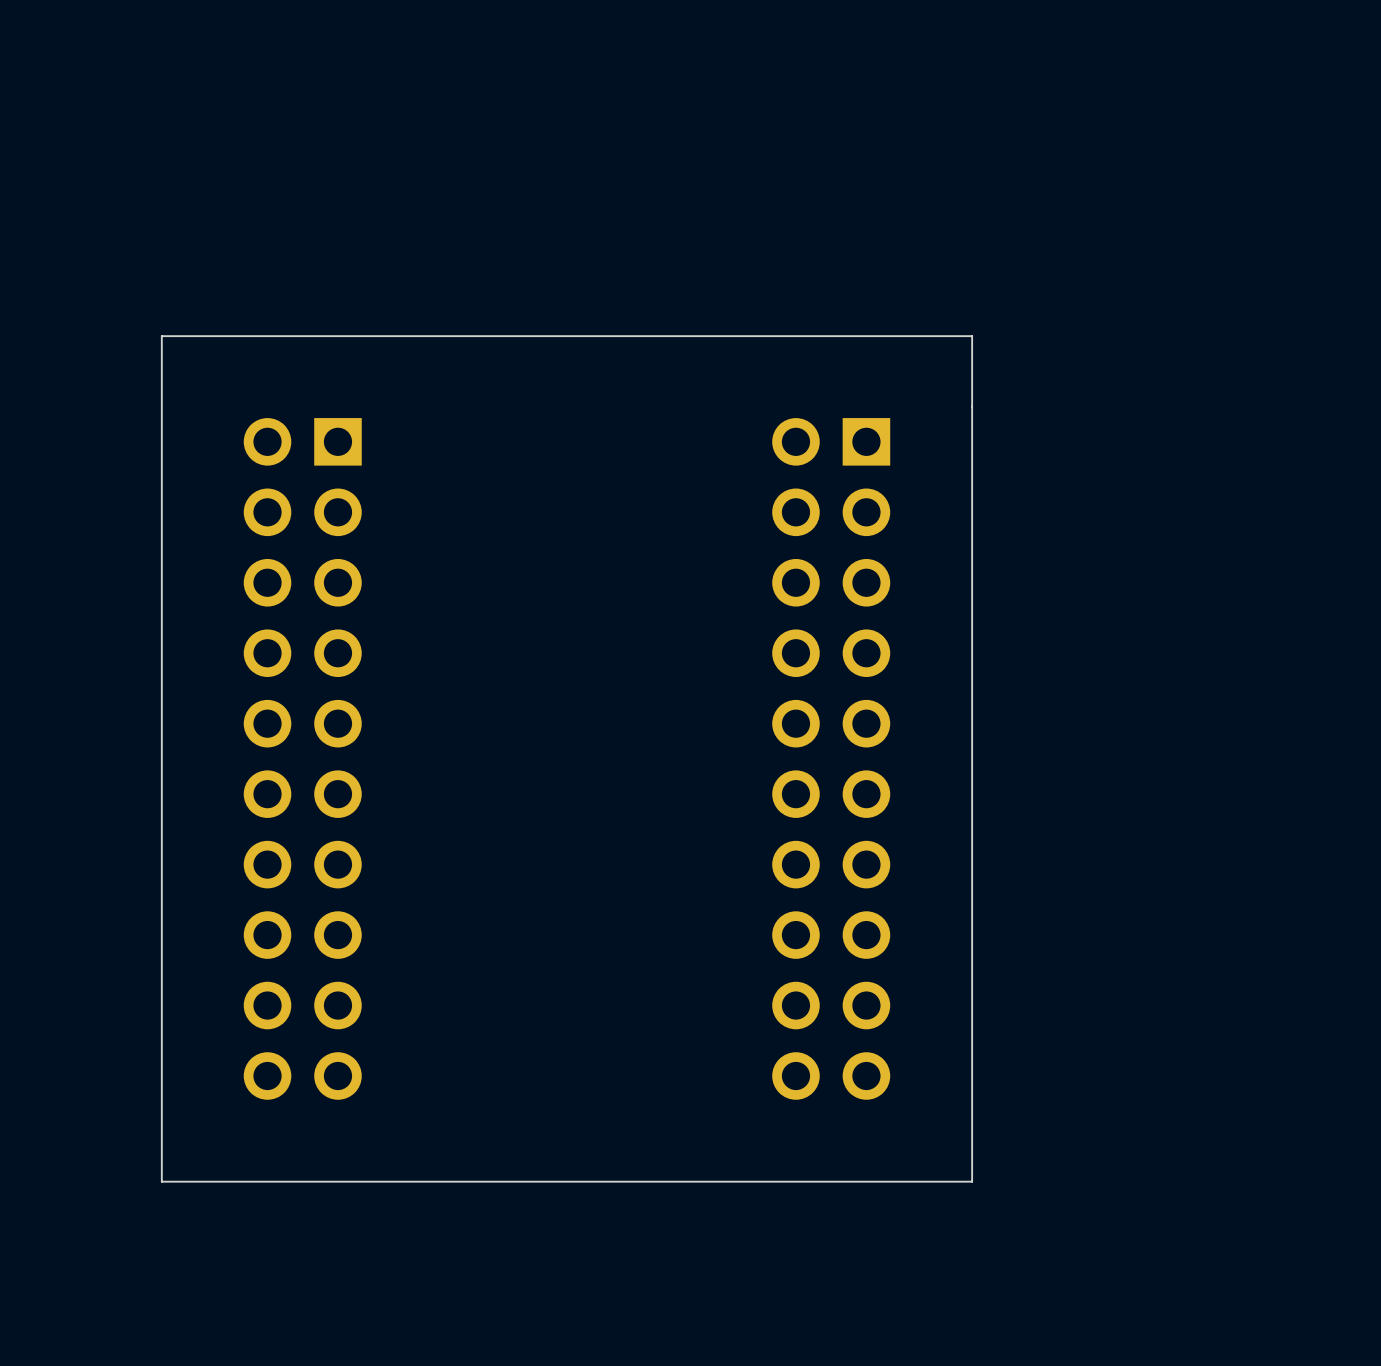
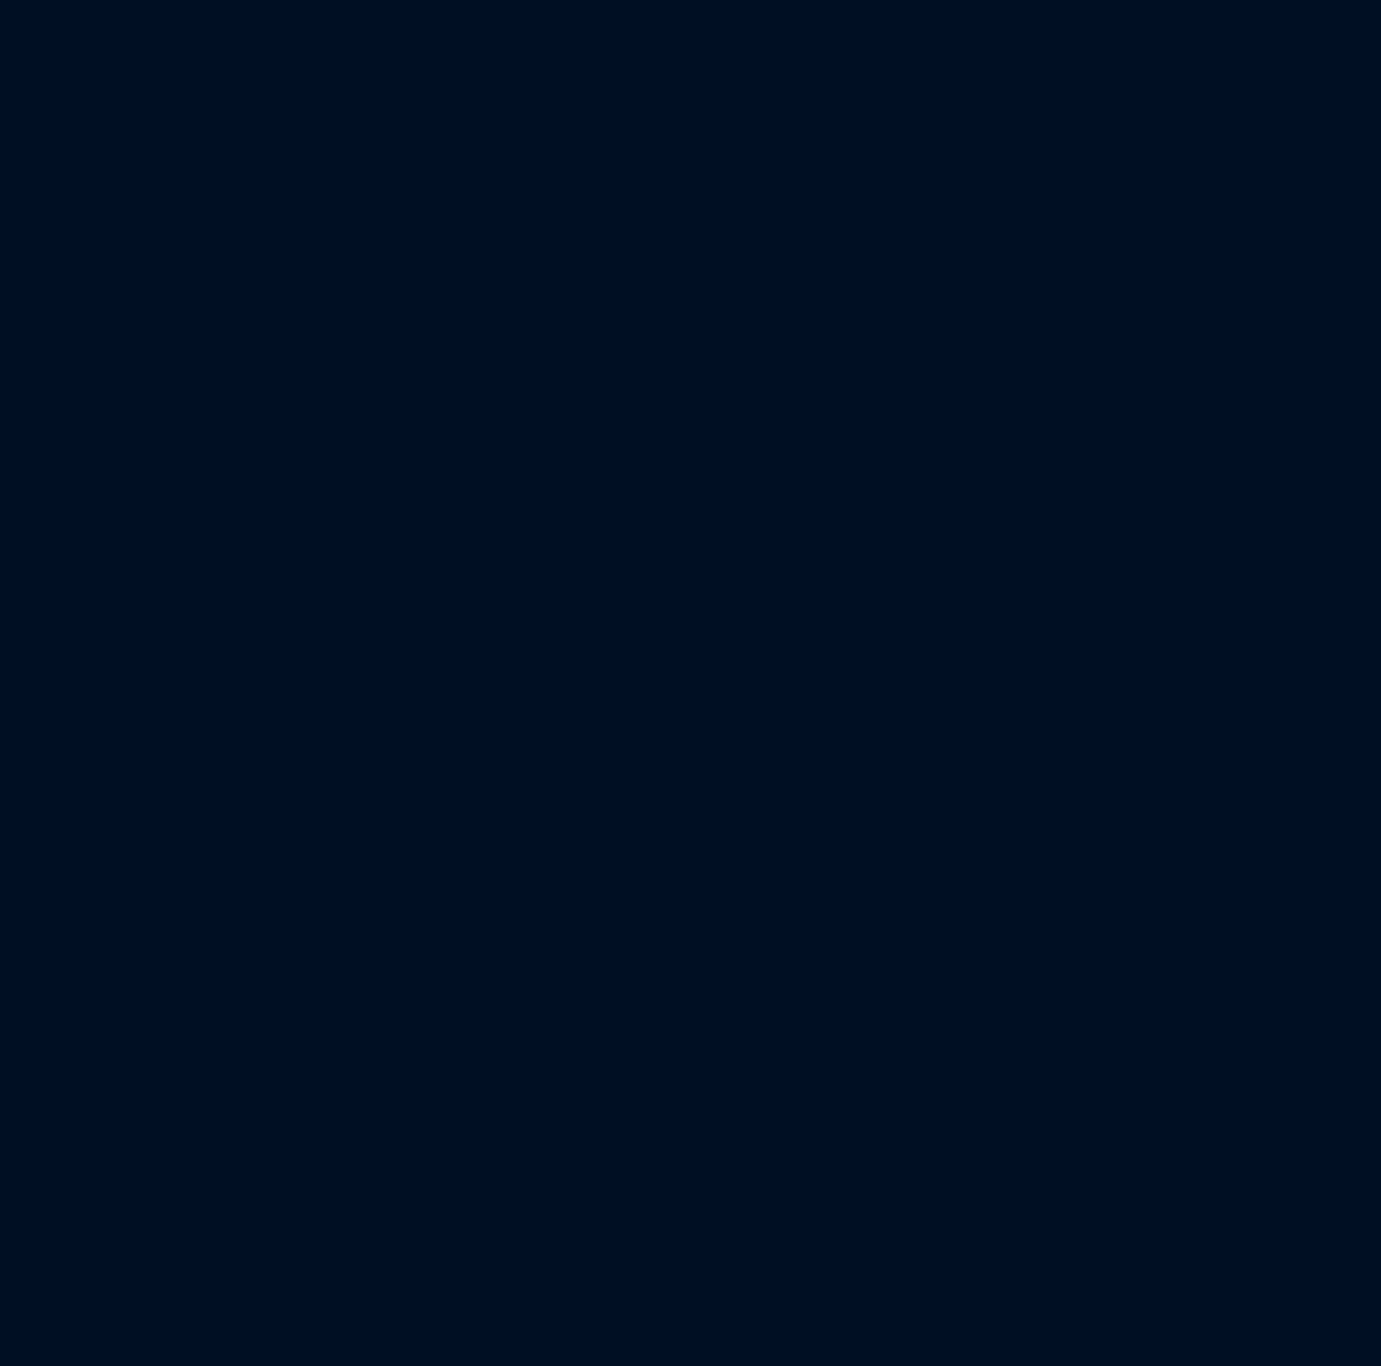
board edge: (972, 336) (972, 1181) (161, 1181) (161, 336) (972, 336) -> none
part: (302, 758) -> none
part: (831, 758) -> none

